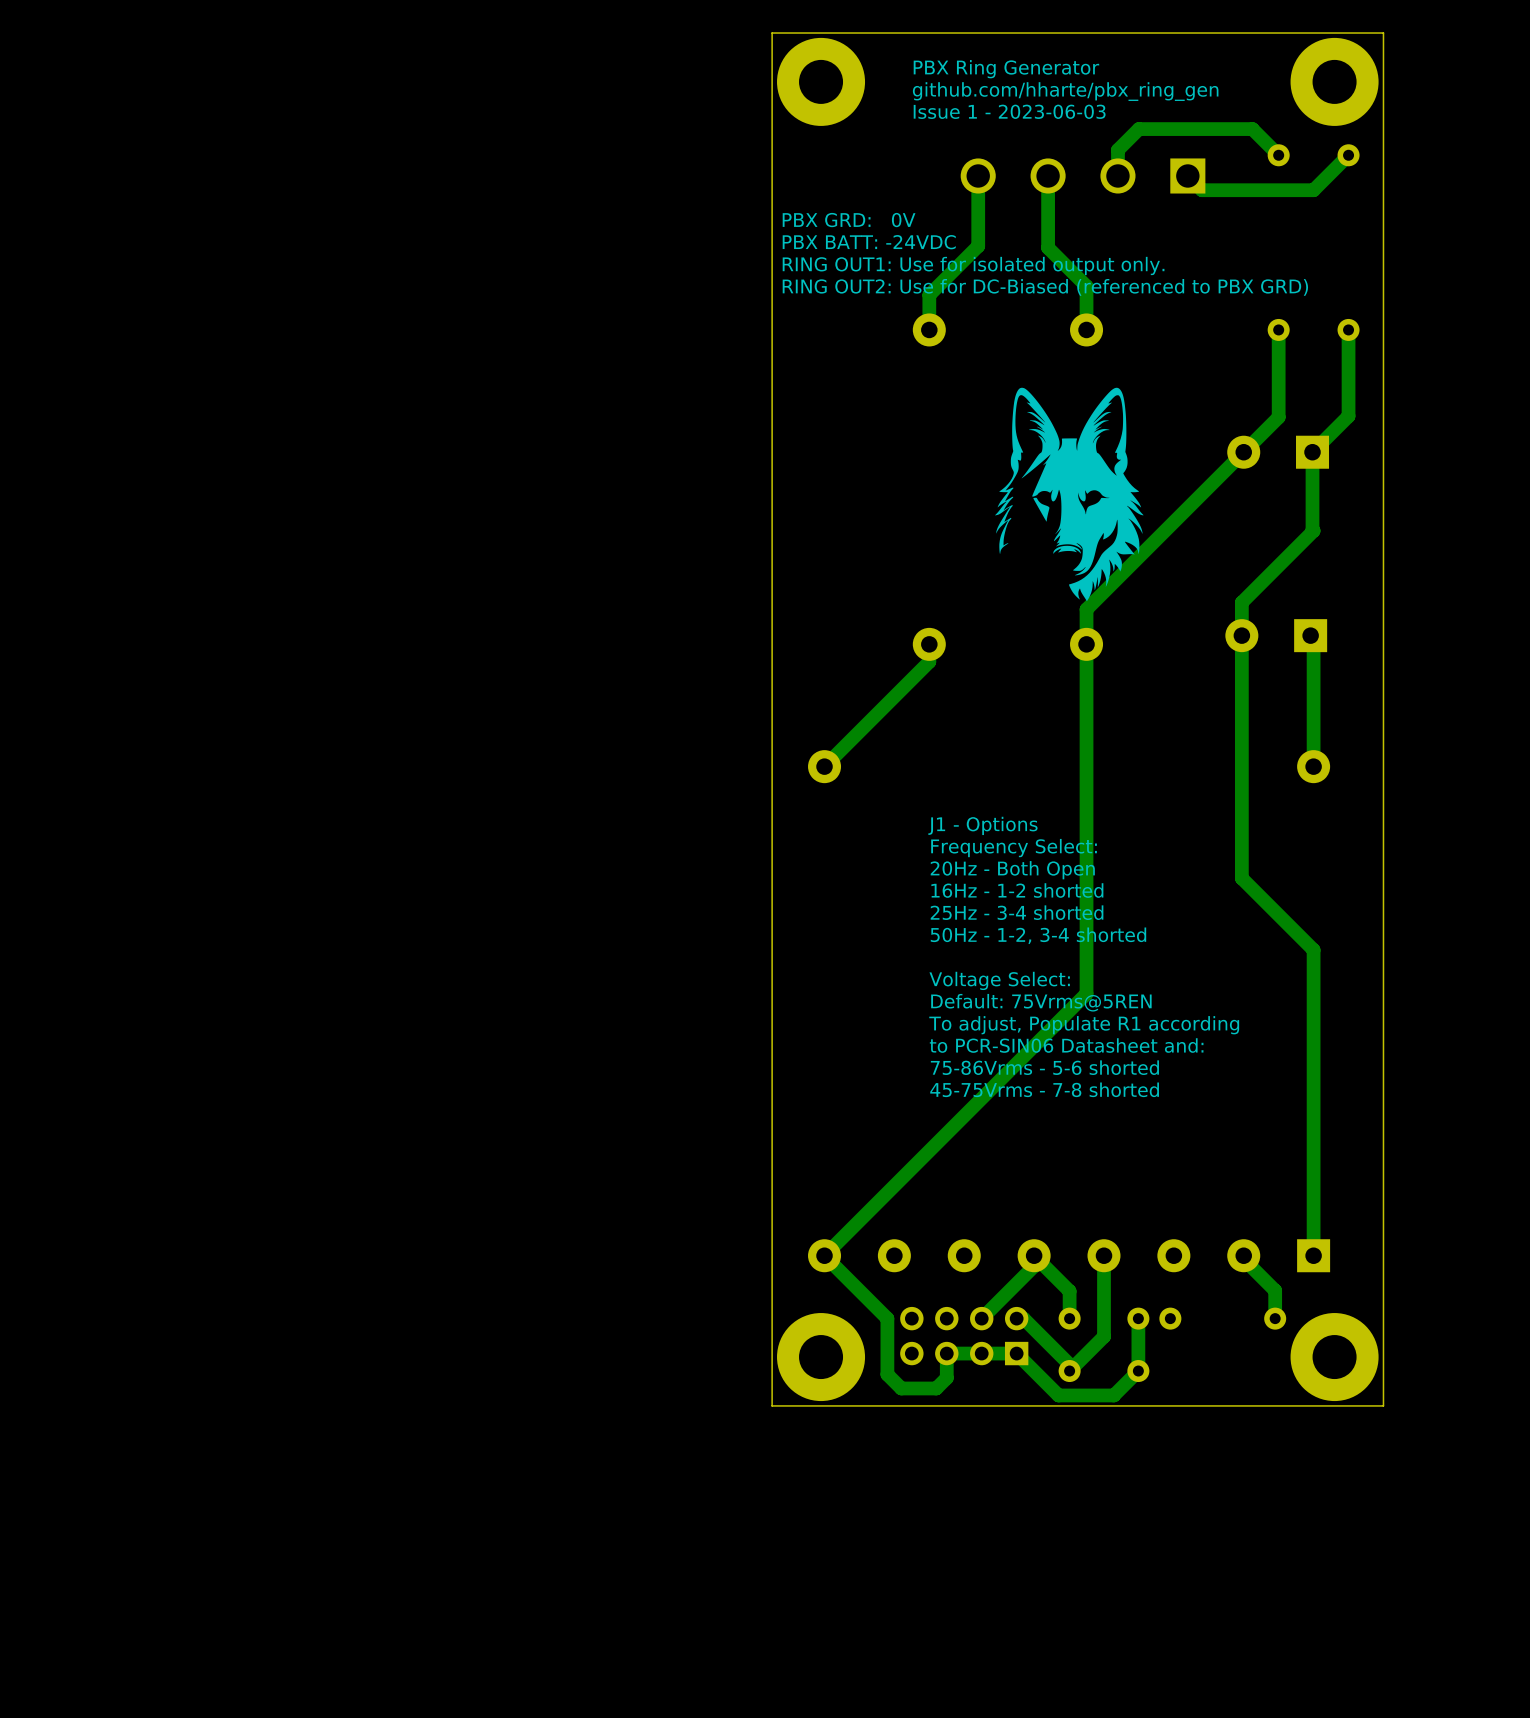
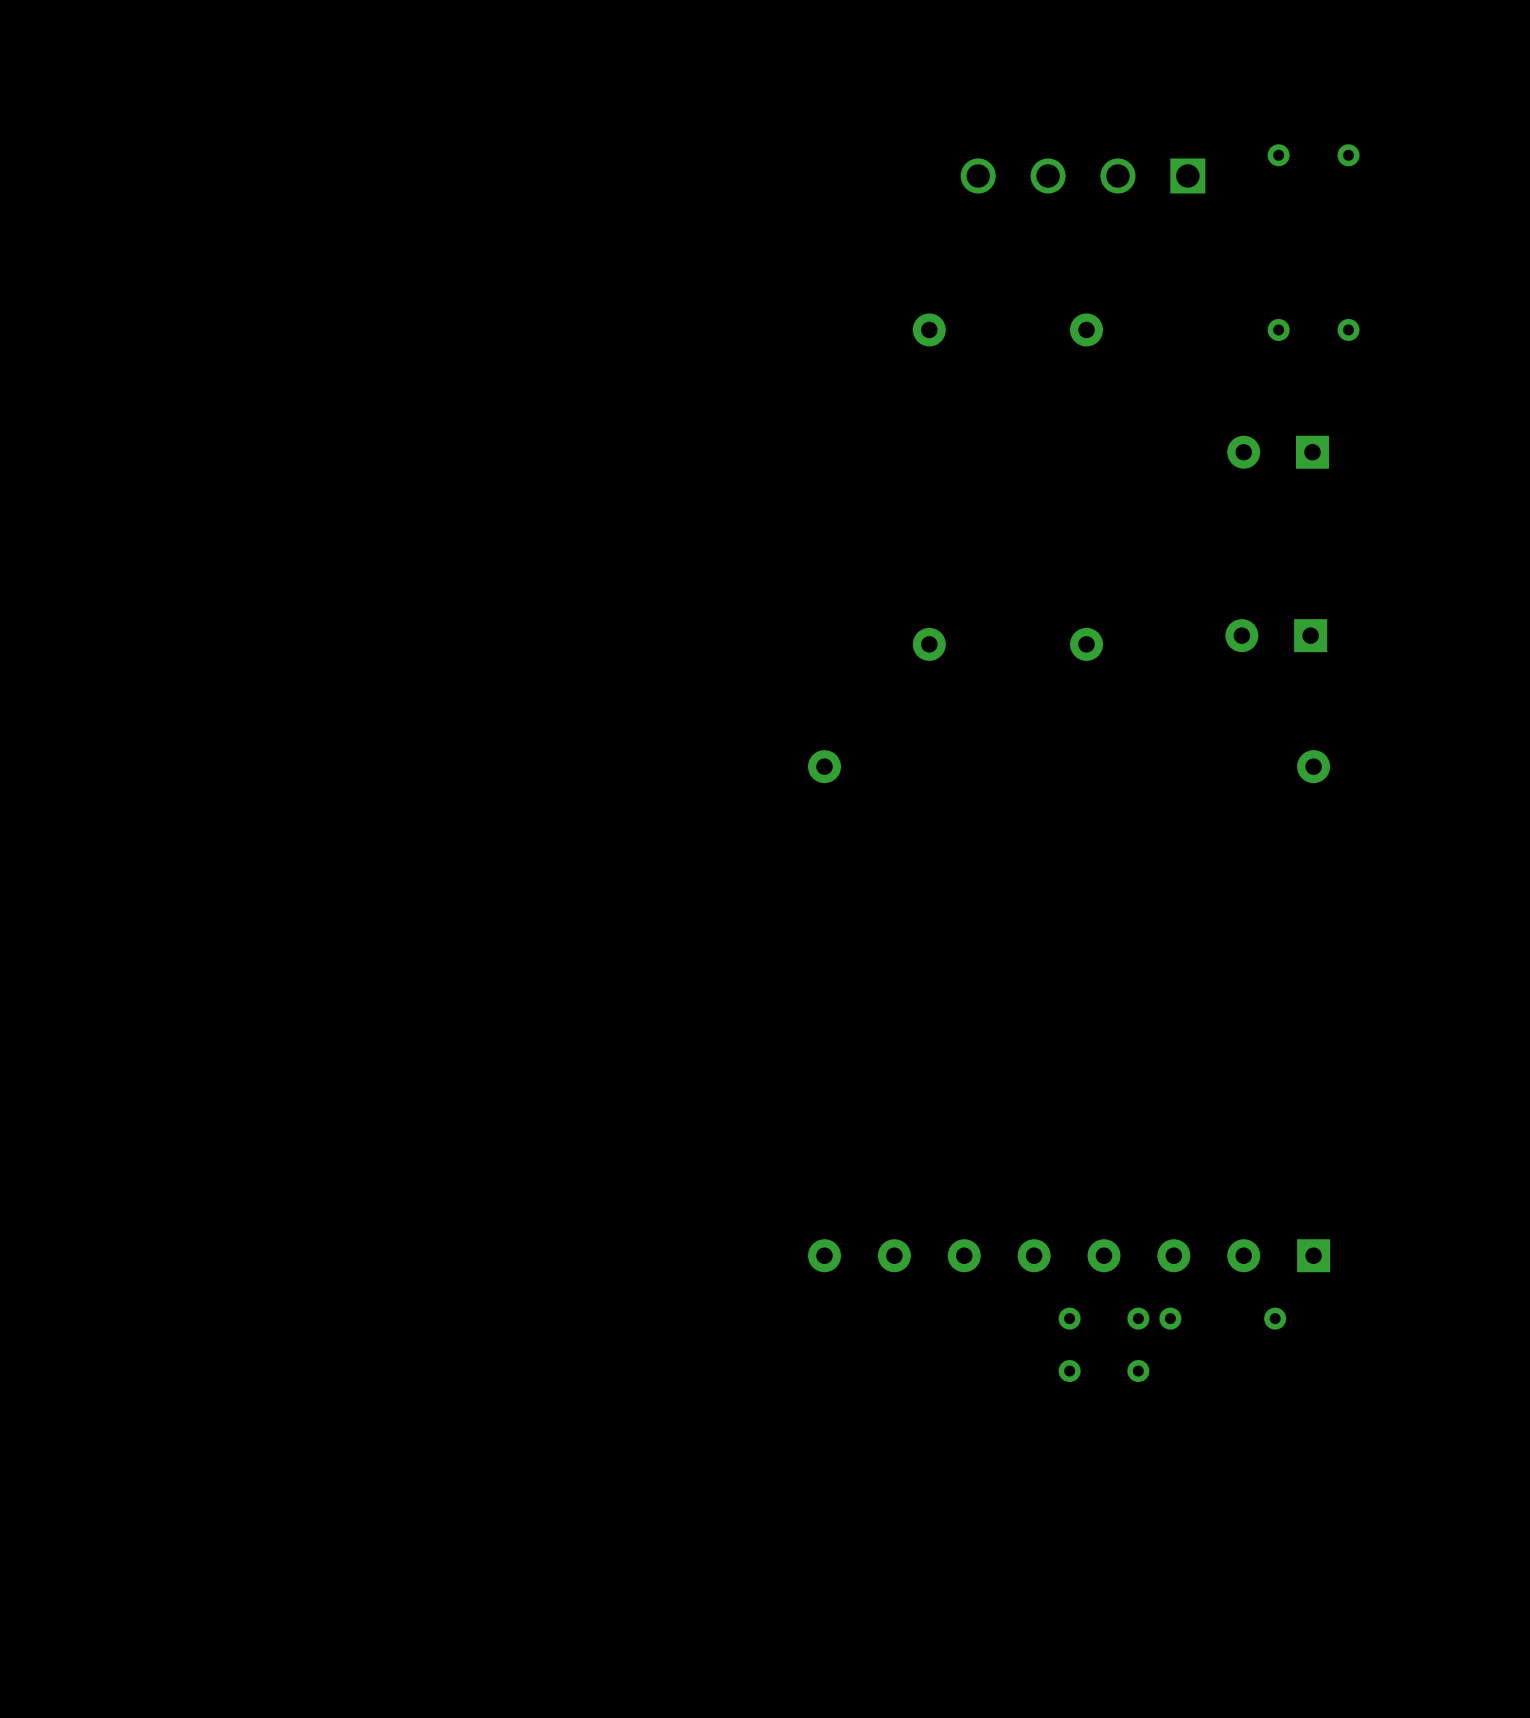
board edge: (1383, 33) (1383, 1405) (772, 1405) (772, 33) (1383, 33) -> none
text: PBX Ring Generator (1006, 69) -> none
part: (821, 81) -> none
part: (1334, 81) -> none
text: github.com/hharte/pbx_ring_gen (1065, 91) -> none
text: Issue 1 - 2023-06-03 (1009, 111) -> none
track: (1278, 155) (1252, 129) (1138, 129) (1117, 150) (1117, 175) -> none
track: (1348, 155) (1313, 190) (1202, 190) (1187, 175) -> none
track: (978, 175) (978, 246) (929, 295) (929, 329) -> none
track: (1048, 175) (1048, 247) (1086, 286) (1086, 329) -> none
text: PBX GRD: 0V (849, 220) -> none
text: PBX BATT: -24VDC (869, 242) -> none
text: RING OUT1: Use for isolated output only. (973, 265) -> none
text: RING OUT2: Use for DC-Biased (referenced to PBX GRD) (1045, 287) -> none
track: (1278, 329) (1278, 417) (1086, 609) (1086, 993) (824, 1255) (887, 1318) (887, 1374) (901, 1388) (936, 1388) (946, 1378) (946, 1353) (1016, 1353) (1058, 1395) (1113, 1395) (1138, 1371) (1138, 1318) -> none
track: (1348, 329) (1348, 416) (1312, 452) (1313, 530) (1241, 602) (1241, 878) (1313, 950) (1313, 1255) -> none
drawing: [994, 387, 1144, 602] -> none
track: (1310, 635) (1313, 638) (1313, 766) -> none
track: (929, 644) (929, 661) (824, 766) -> none
text: J1 - Options (982, 825) -> none
text: Frequency Select: (1014, 848) -> none
text: 20Hz - Both Open (1012, 870) -> none
text: 16Hz - 1-2 shorted (1017, 890) -> none
text: 25Hz - 3-4 shorted (1017, 912) -> none
text: 50Hz - 1-2, 3-4 shorted (1038, 935) -> none
text: Voltage Select: (999, 980) -> none
text: Default: 75Vrms@5REN (1041, 1002) -> none
text: To adjust, Populate R1 according (1084, 1025) -> none
text: to PCR-SIN06 Datasheet and: (1066, 1045) -> none
text: 75-86Vrms - 5-6 shorted (1044, 1067) -> none
text: 45-75Vrms - 7-8 shorted (1044, 1089) -> none
track: (1103, 1255) (1103, 1336) (1069, 1371) (1069, 1364) (1023, 1318) (1016, 1318) -> none
track: (1243, 1255) (1243, 1259) (1275, 1290) (1275, 1318) -> none
track: (1069, 1318) (1069, 1291) (1034, 1255) (1034, 1266) (981, 1318) -> none
part: (964, 1336) -> none
part: (821, 1357) -> none
part: (1334, 1357) -> none

